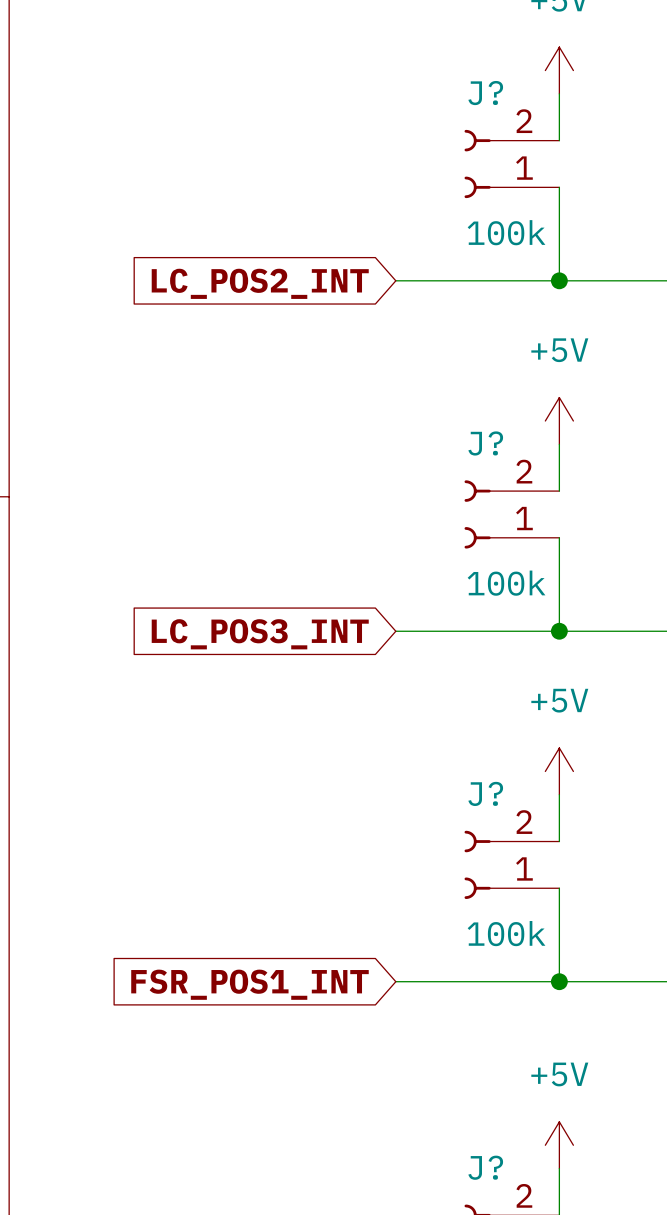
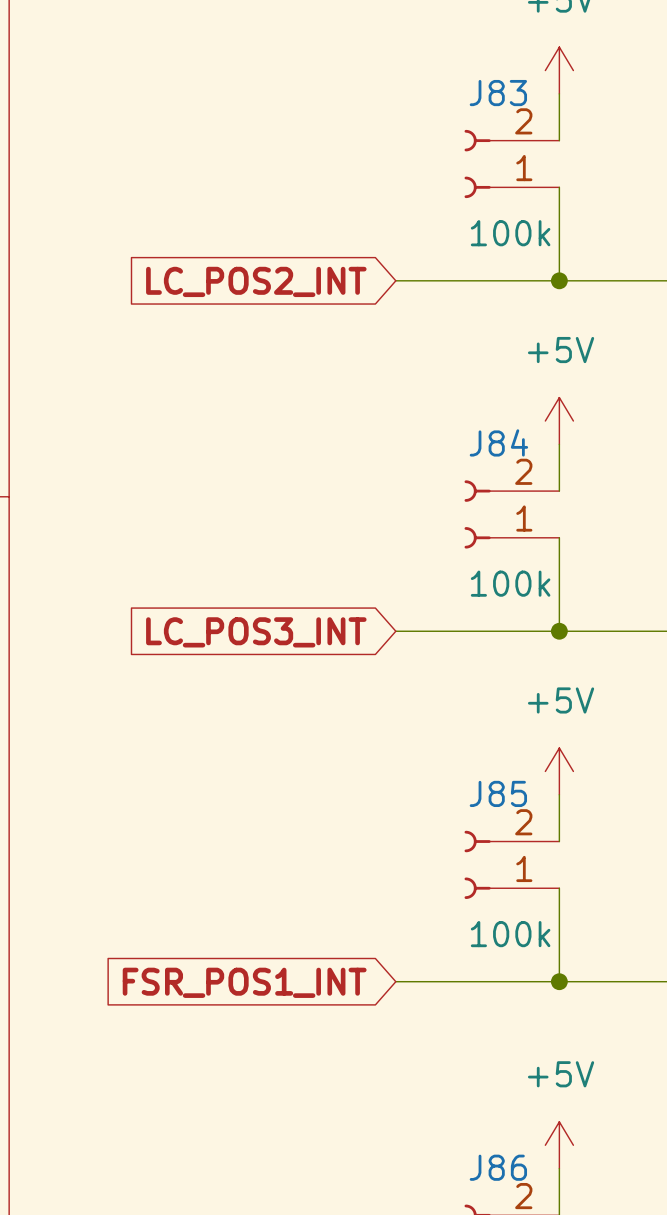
J? name: J? (485, 93) -> J83 (498, 93)
J? name: J? (485, 443) -> J84 (498, 442)
J? name: J? (485, 793) -> J85 (498, 793)
J? name: J? (485, 1167) -> J86 (498, 1167)

